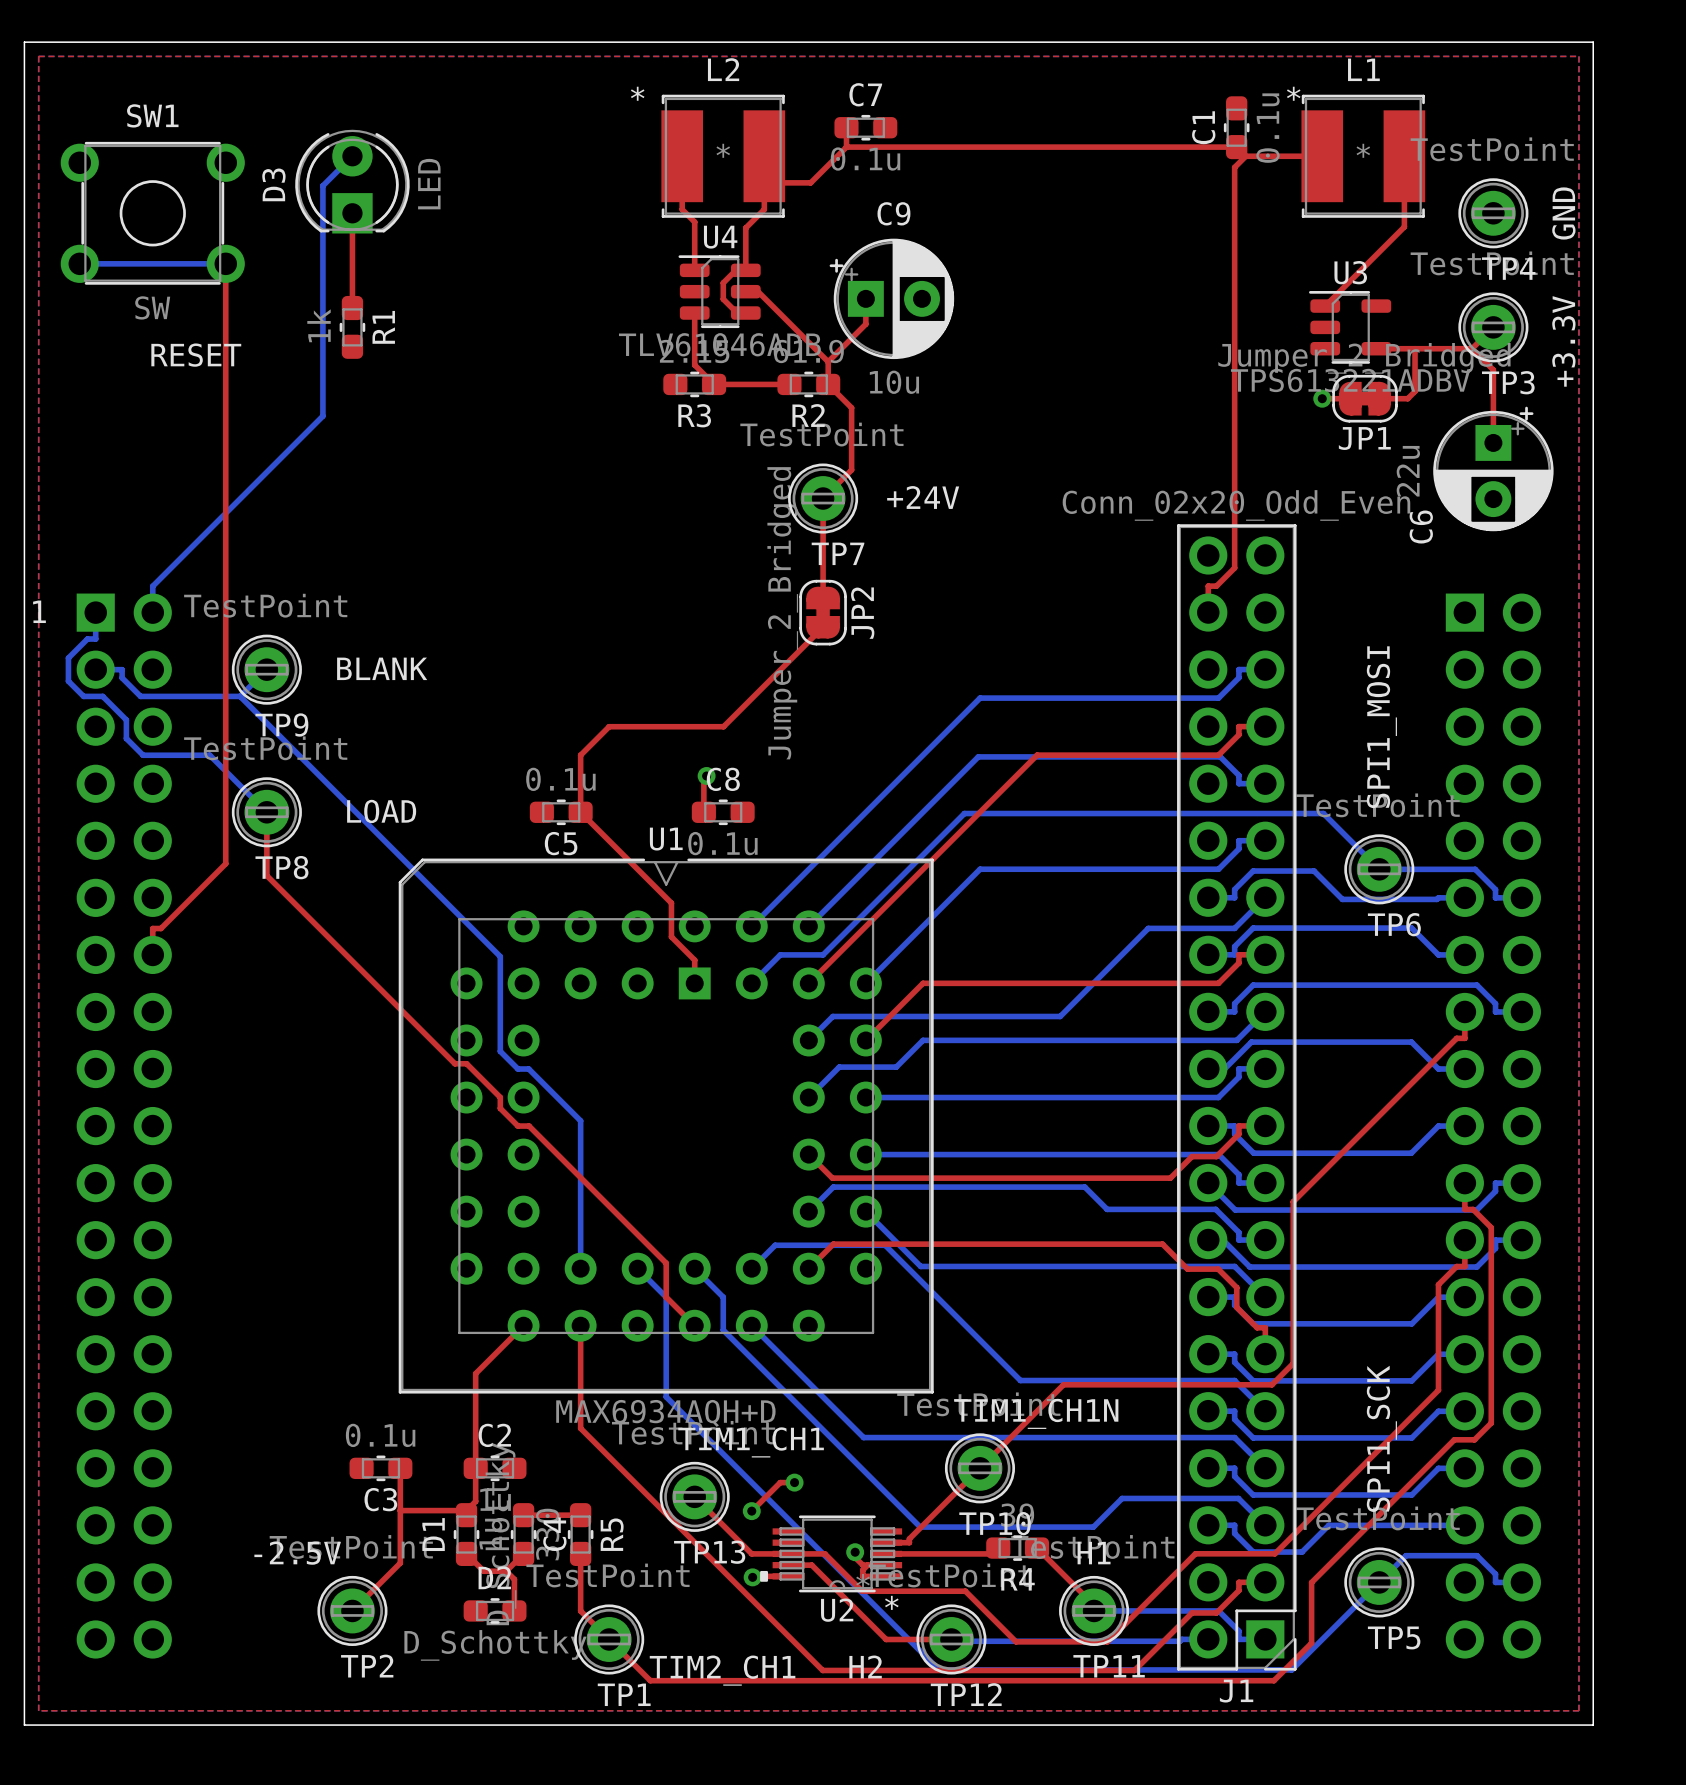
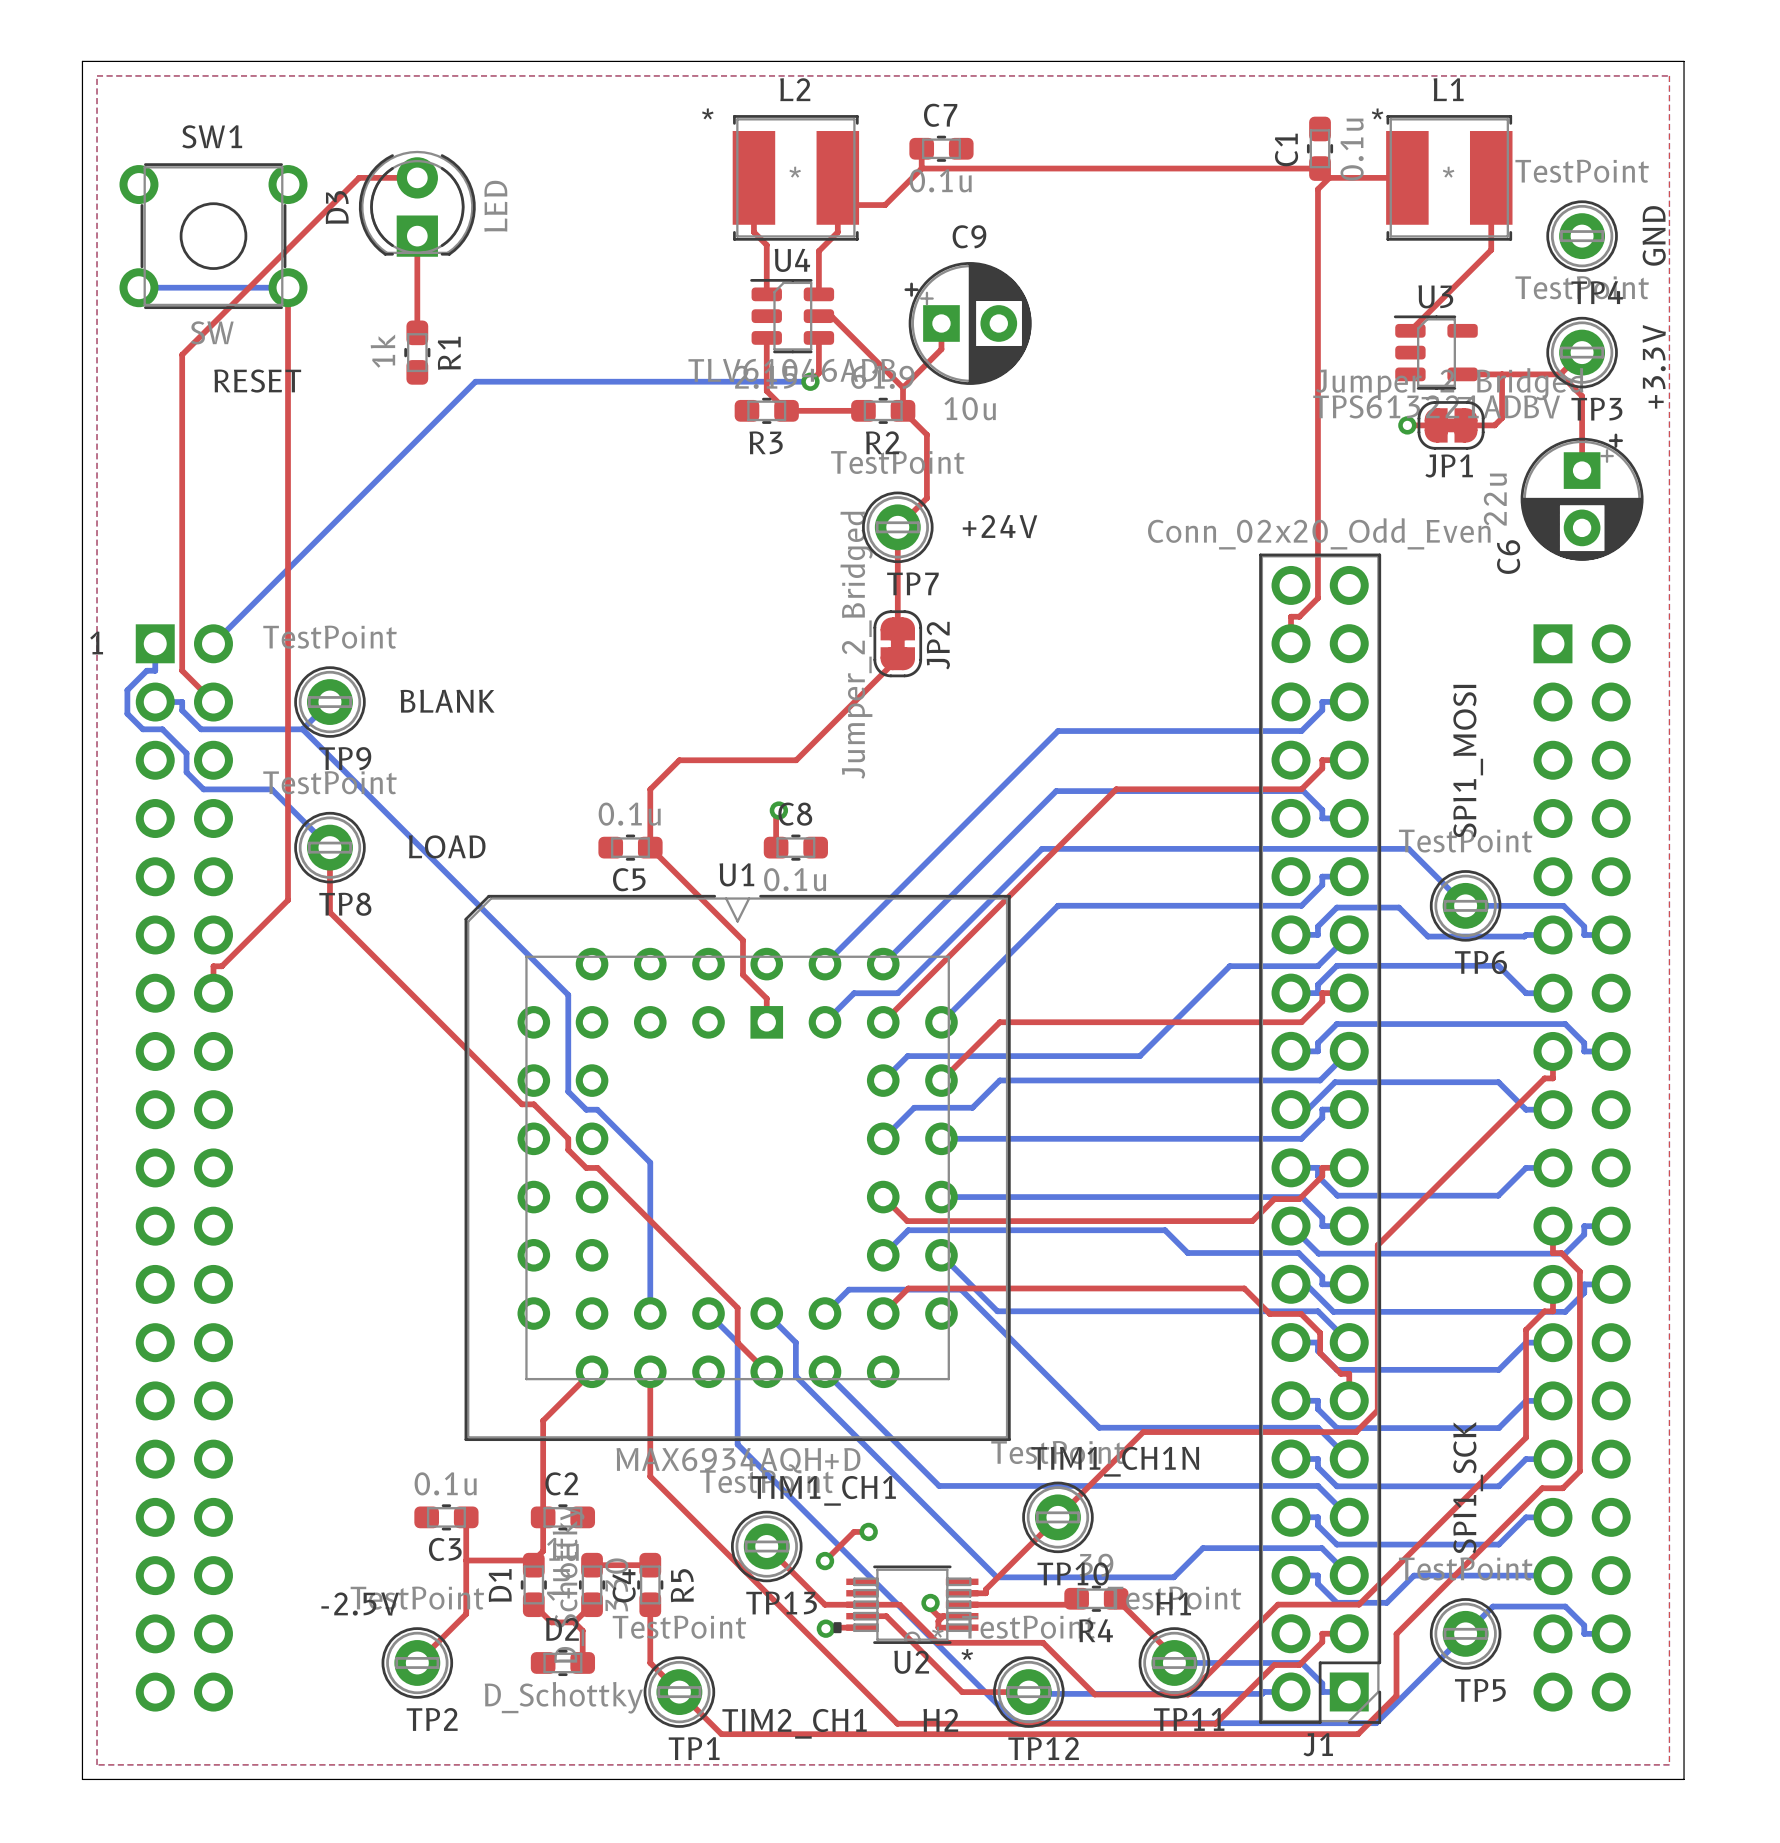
top track: none -> (417, 177) (359, 177) (182, 354) (182, 670) (213, 702)
bottom track: (352, 156) (322, 185) (322, 416) (152, 586) (152, 612) -> (810, 381) (475, 381) (213, 643)
top track: (745, 270) (735, 270) (723, 282) (723, 299) (737, 313) (745, 313) -> (810, 381) (818, 373) (818, 337)
via: none -> (810, 381)

